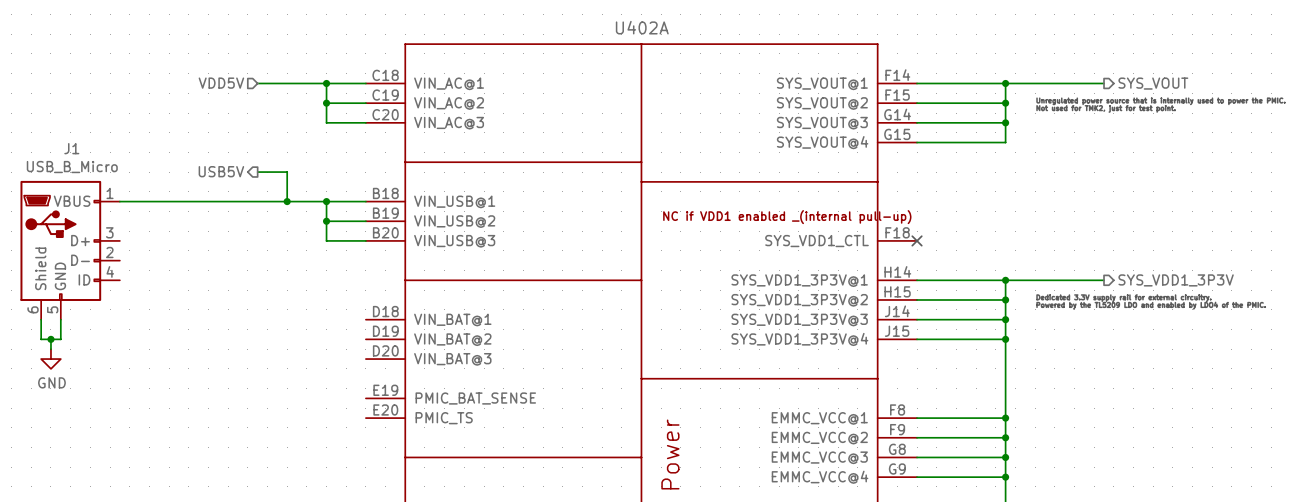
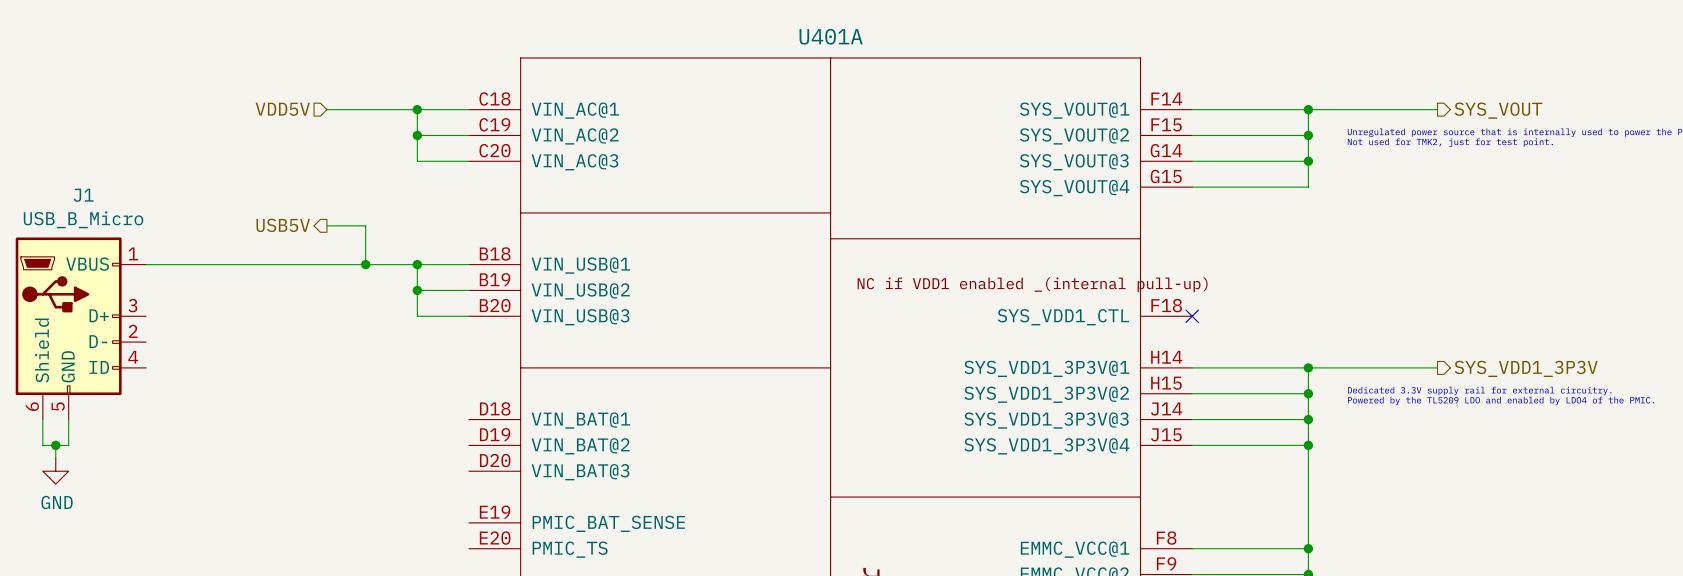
U402A name: U402A (642, 27) -> U401A (831, 36)

